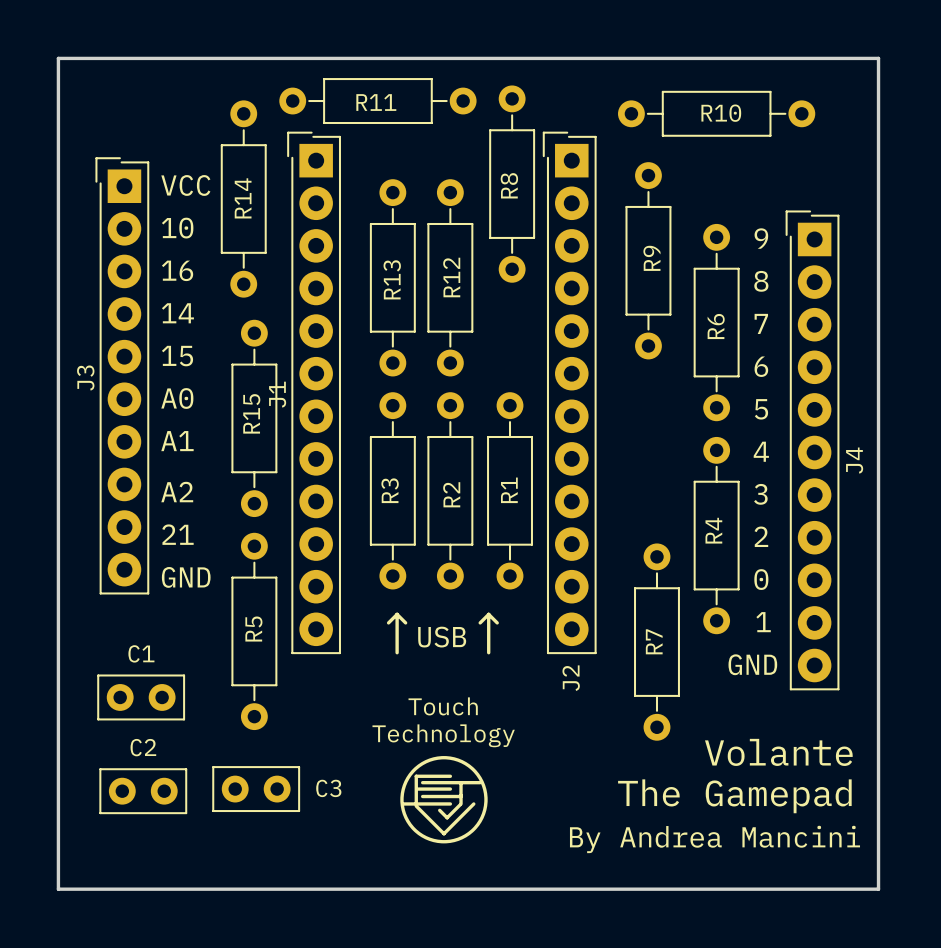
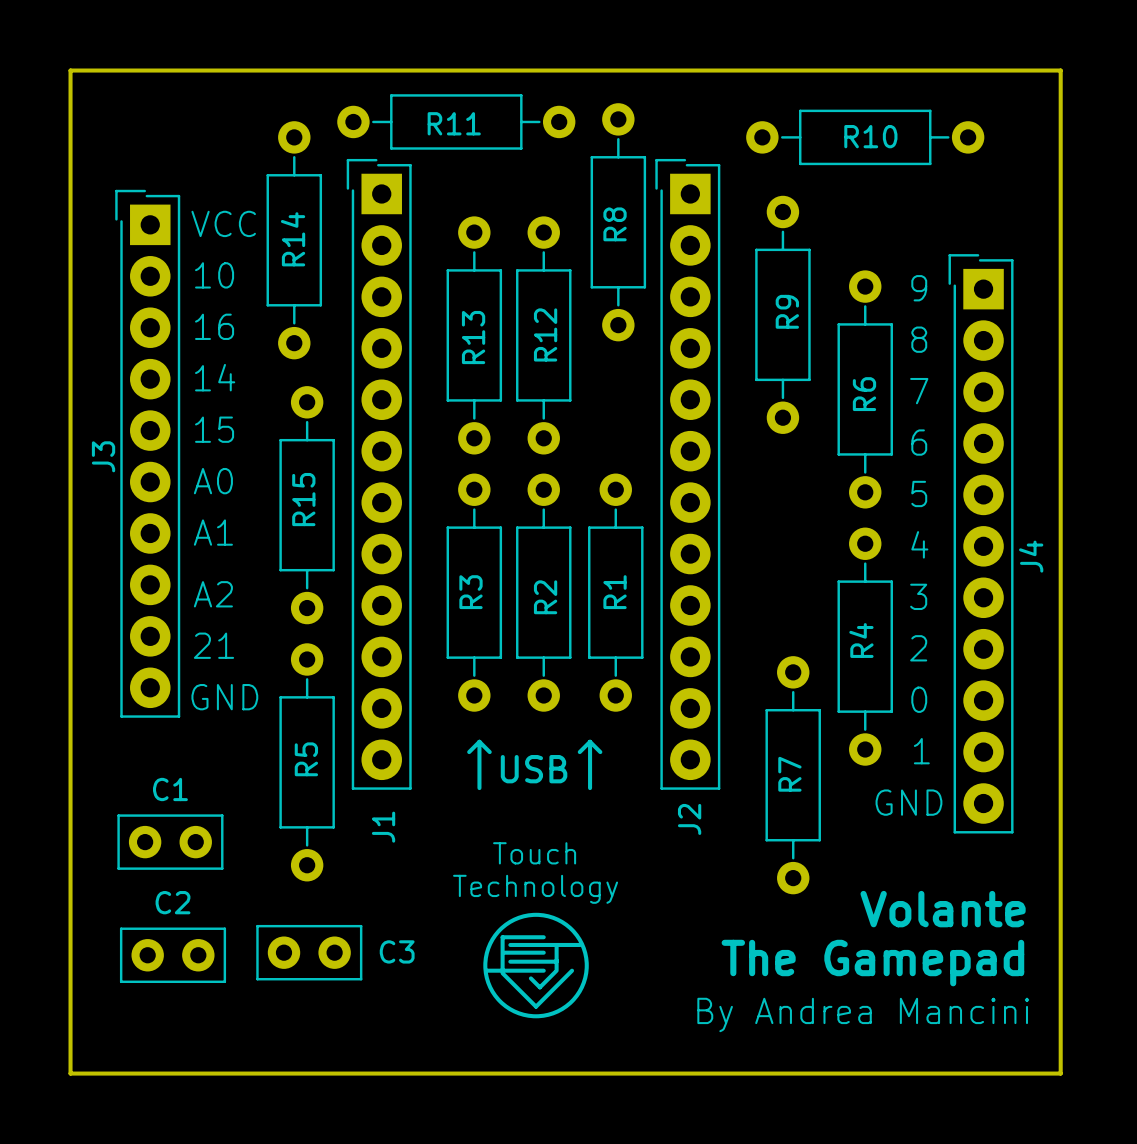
J1 name position: J1 (277, 394) -> J1 (383, 827)

